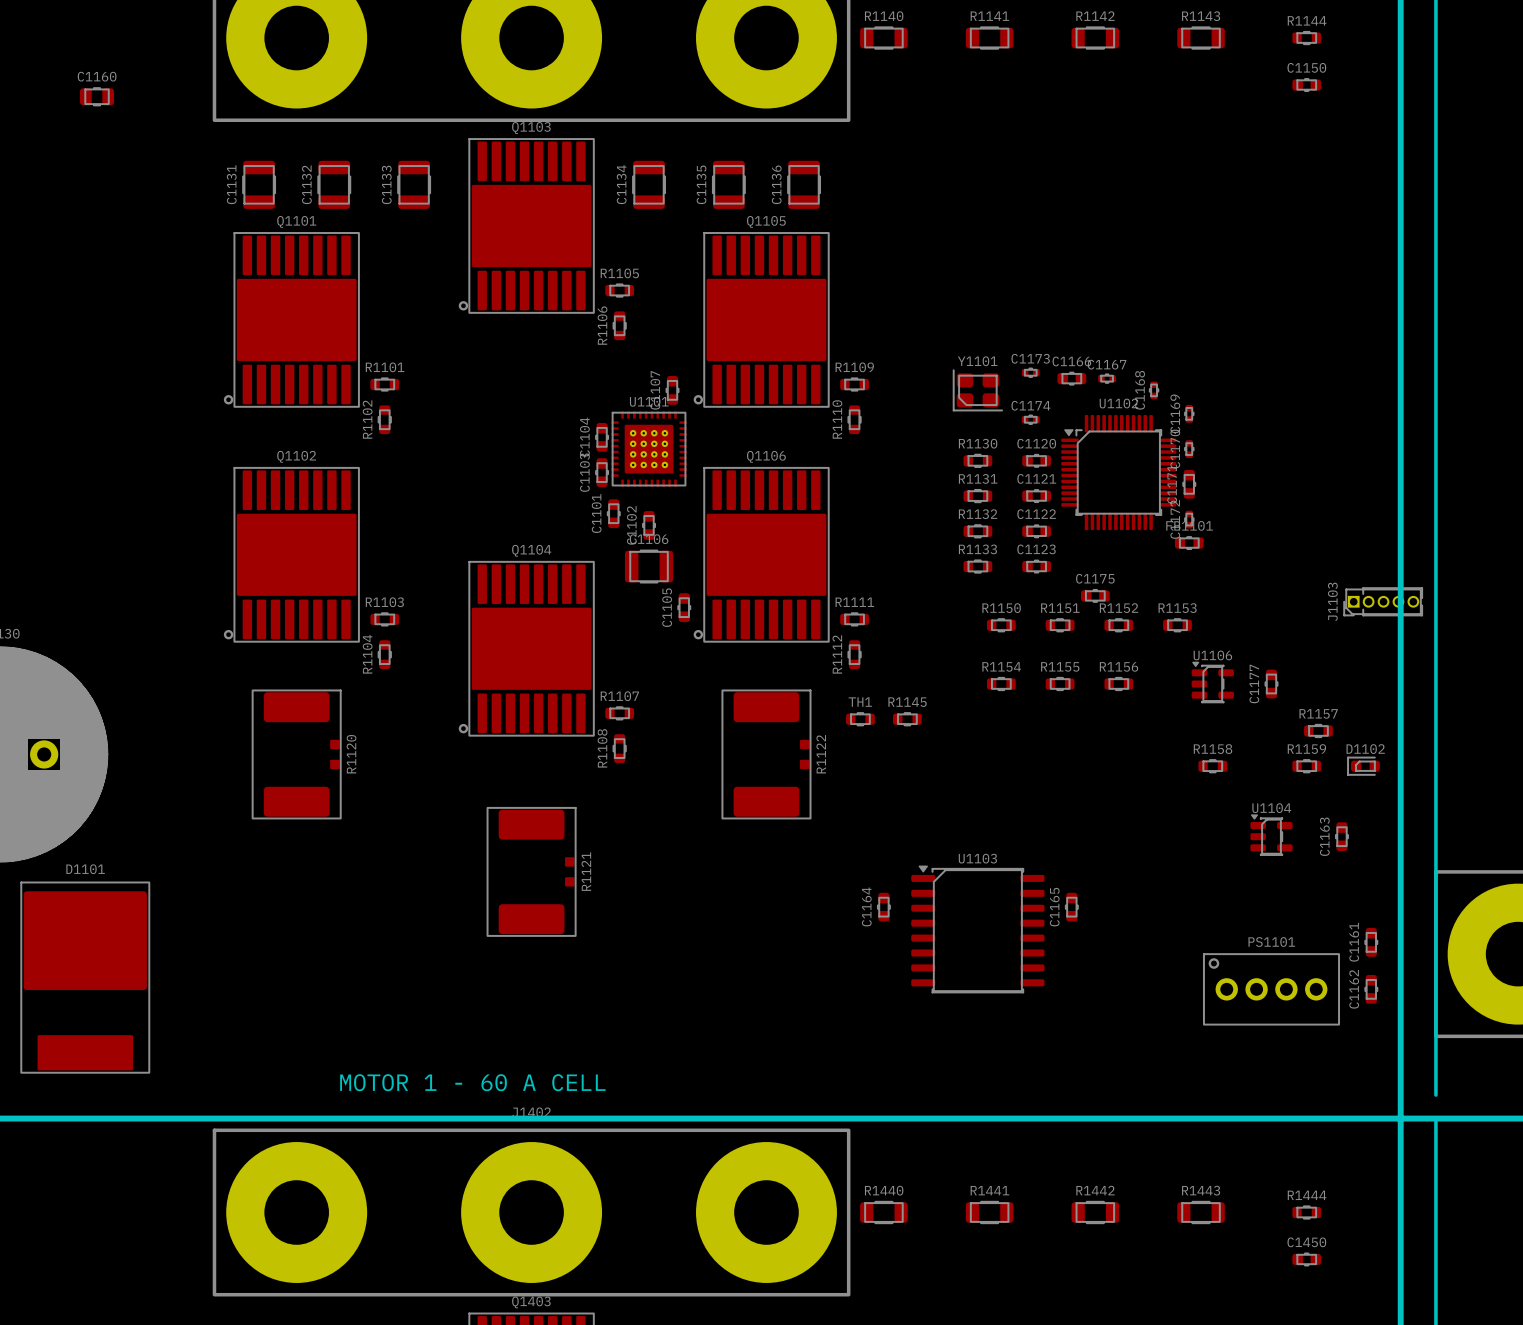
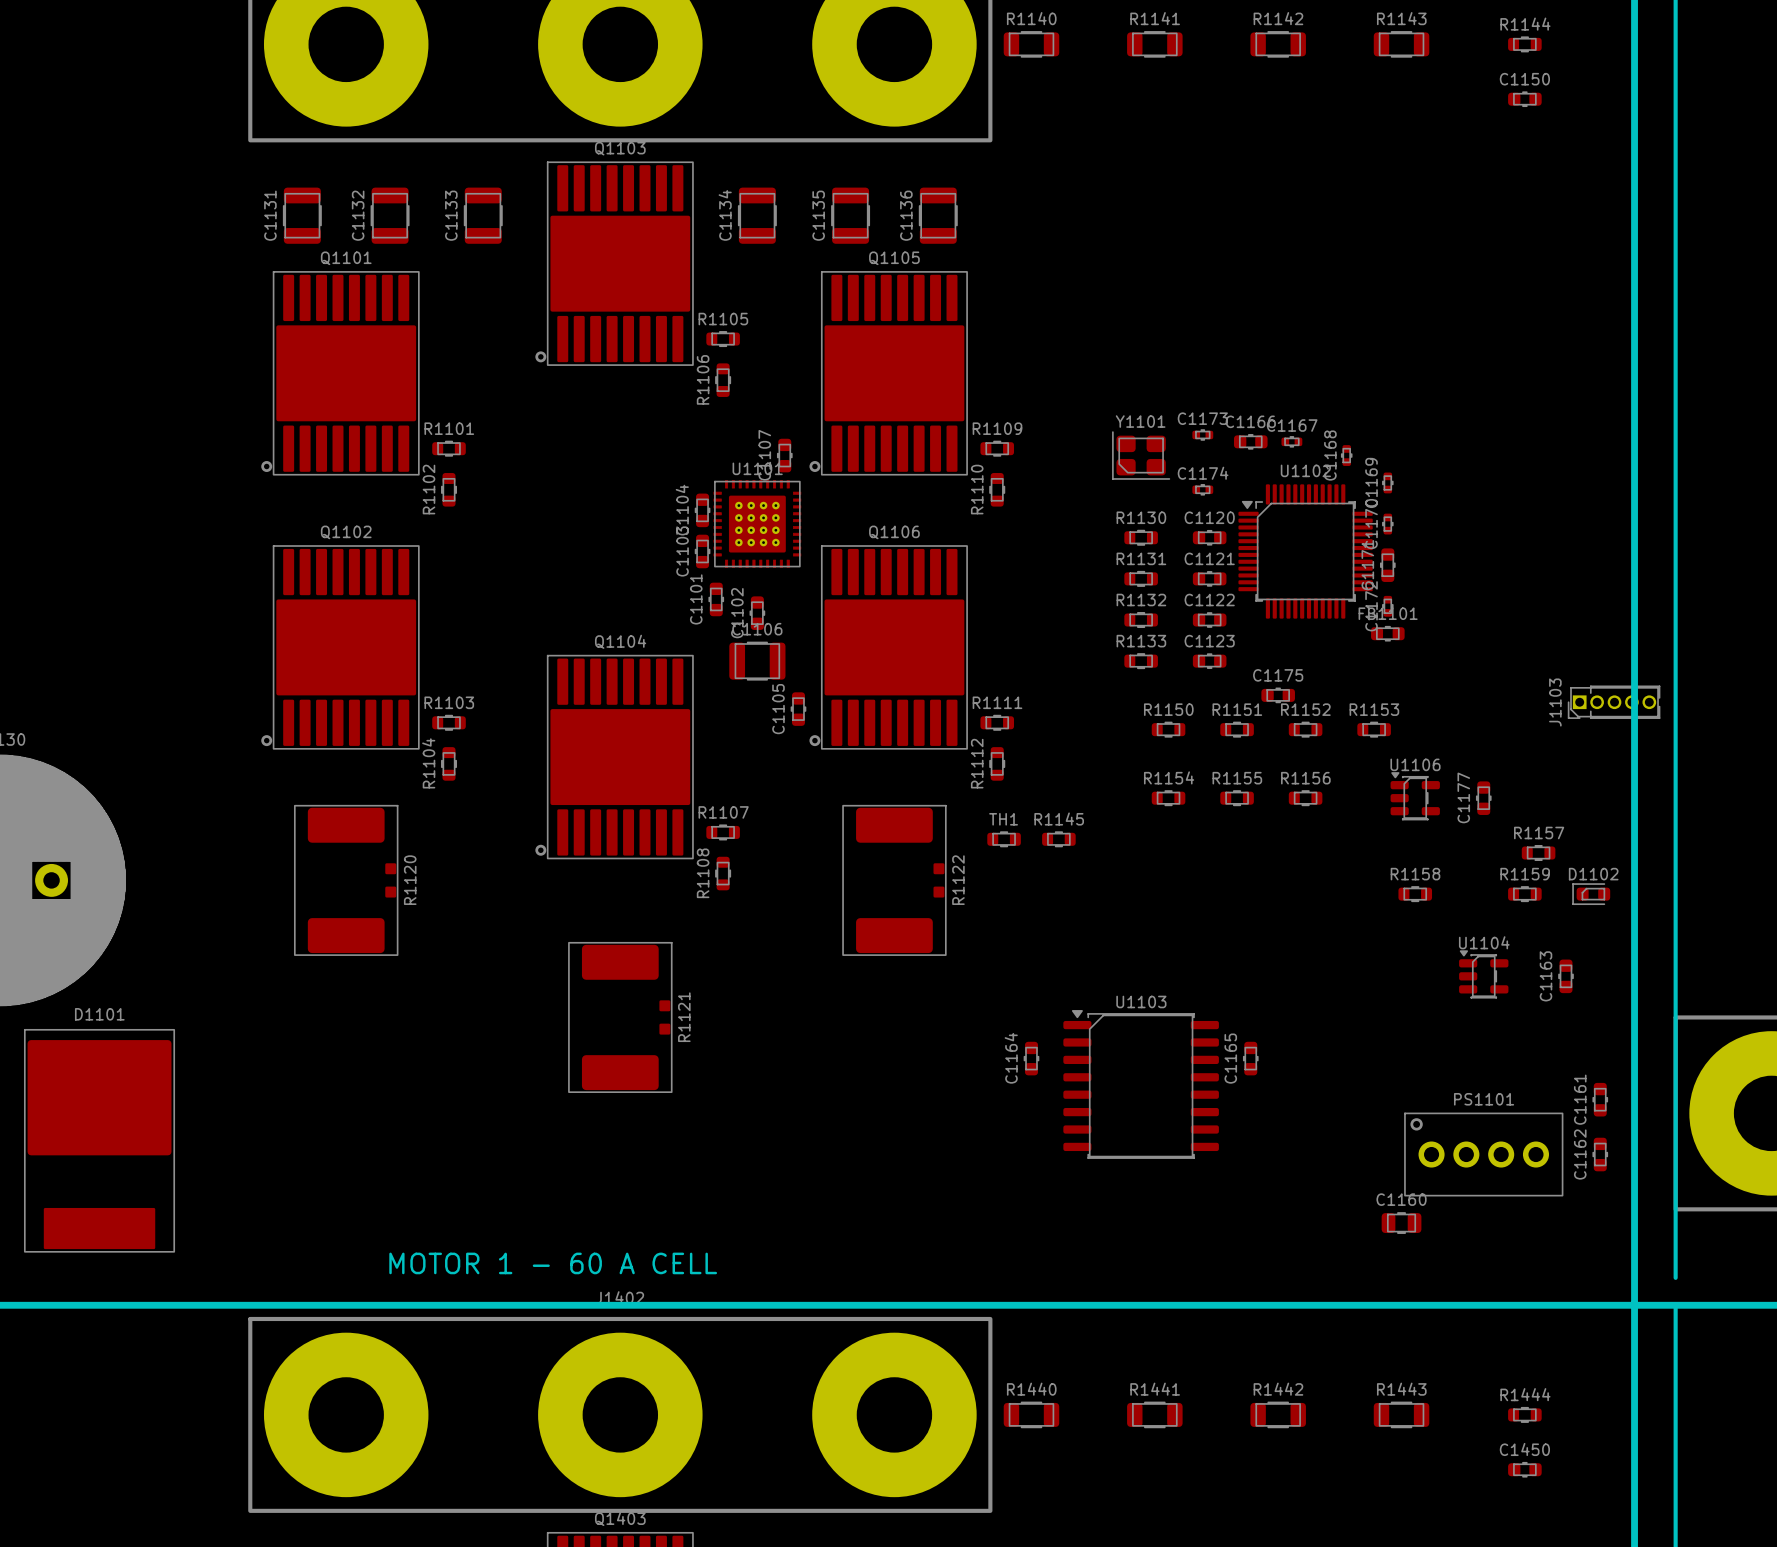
C1160 position: (97, 96) -> (1401, 1223)

